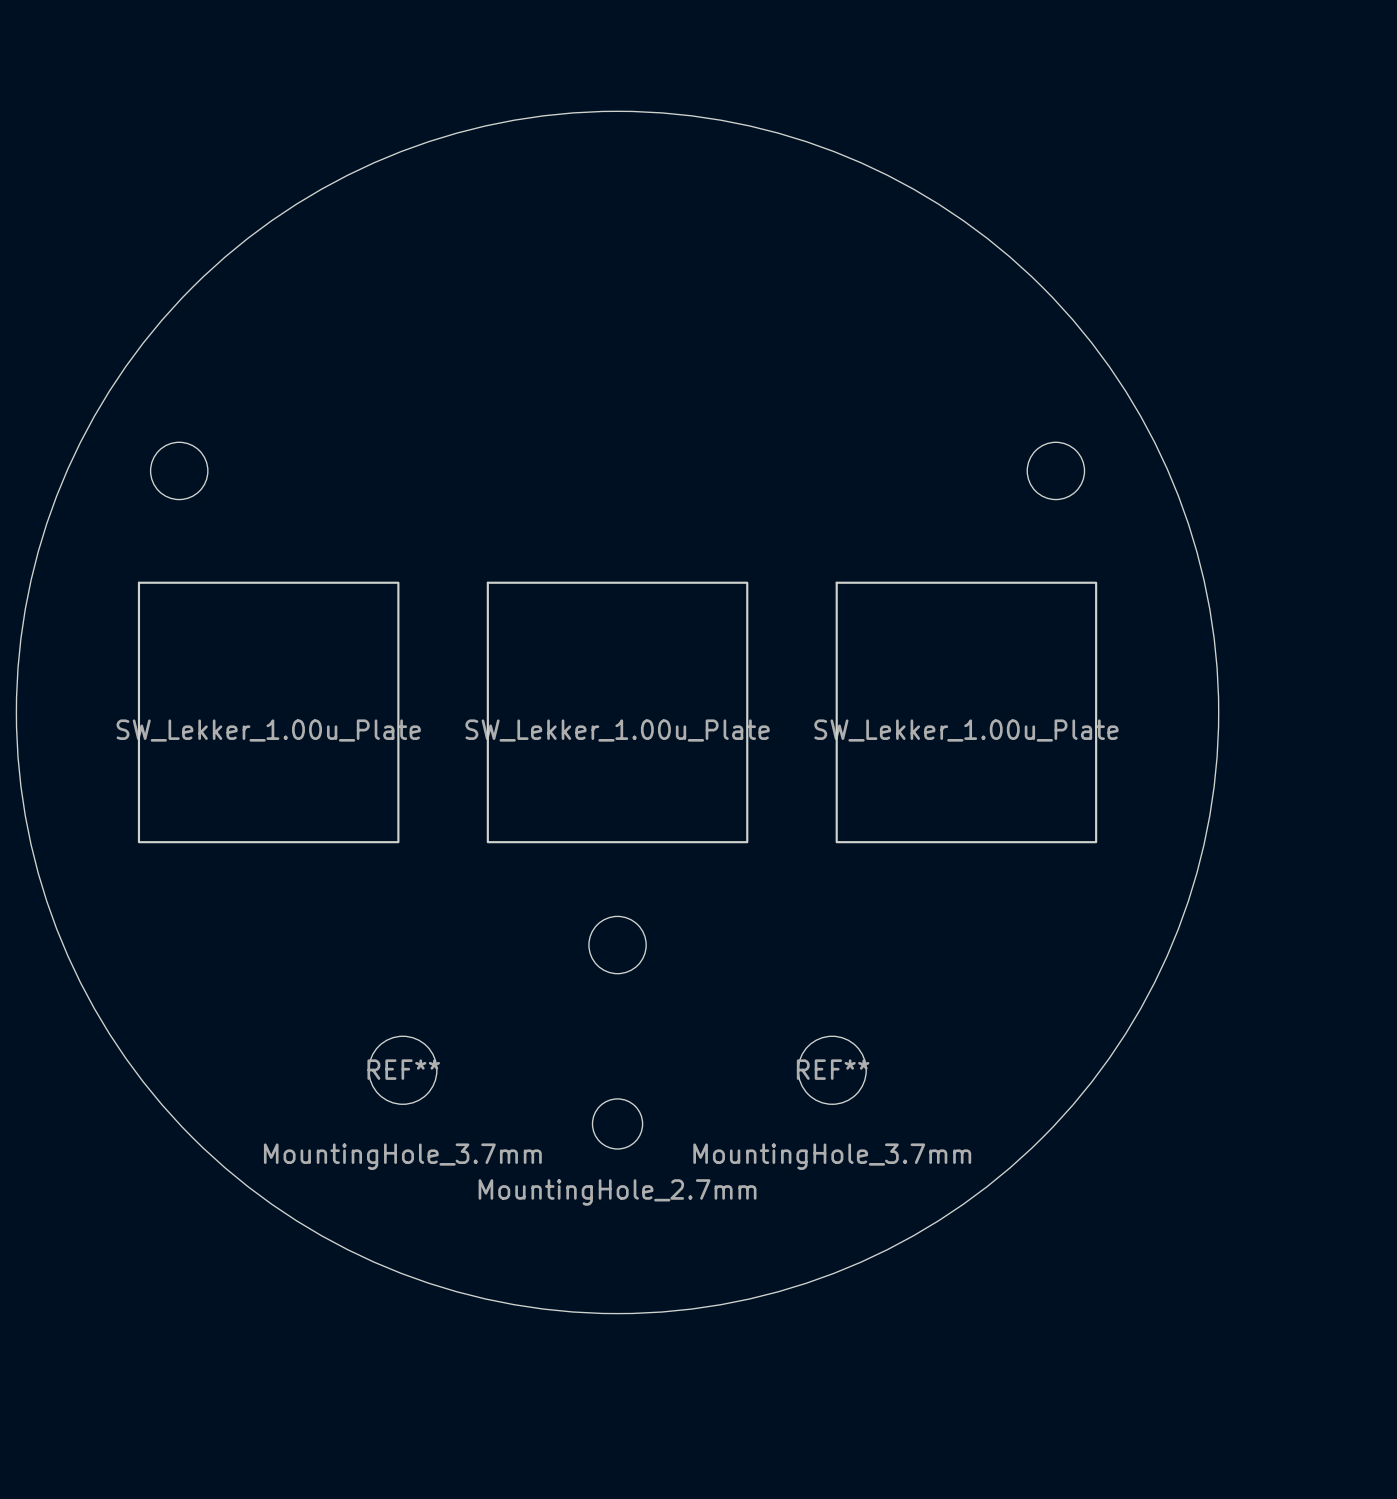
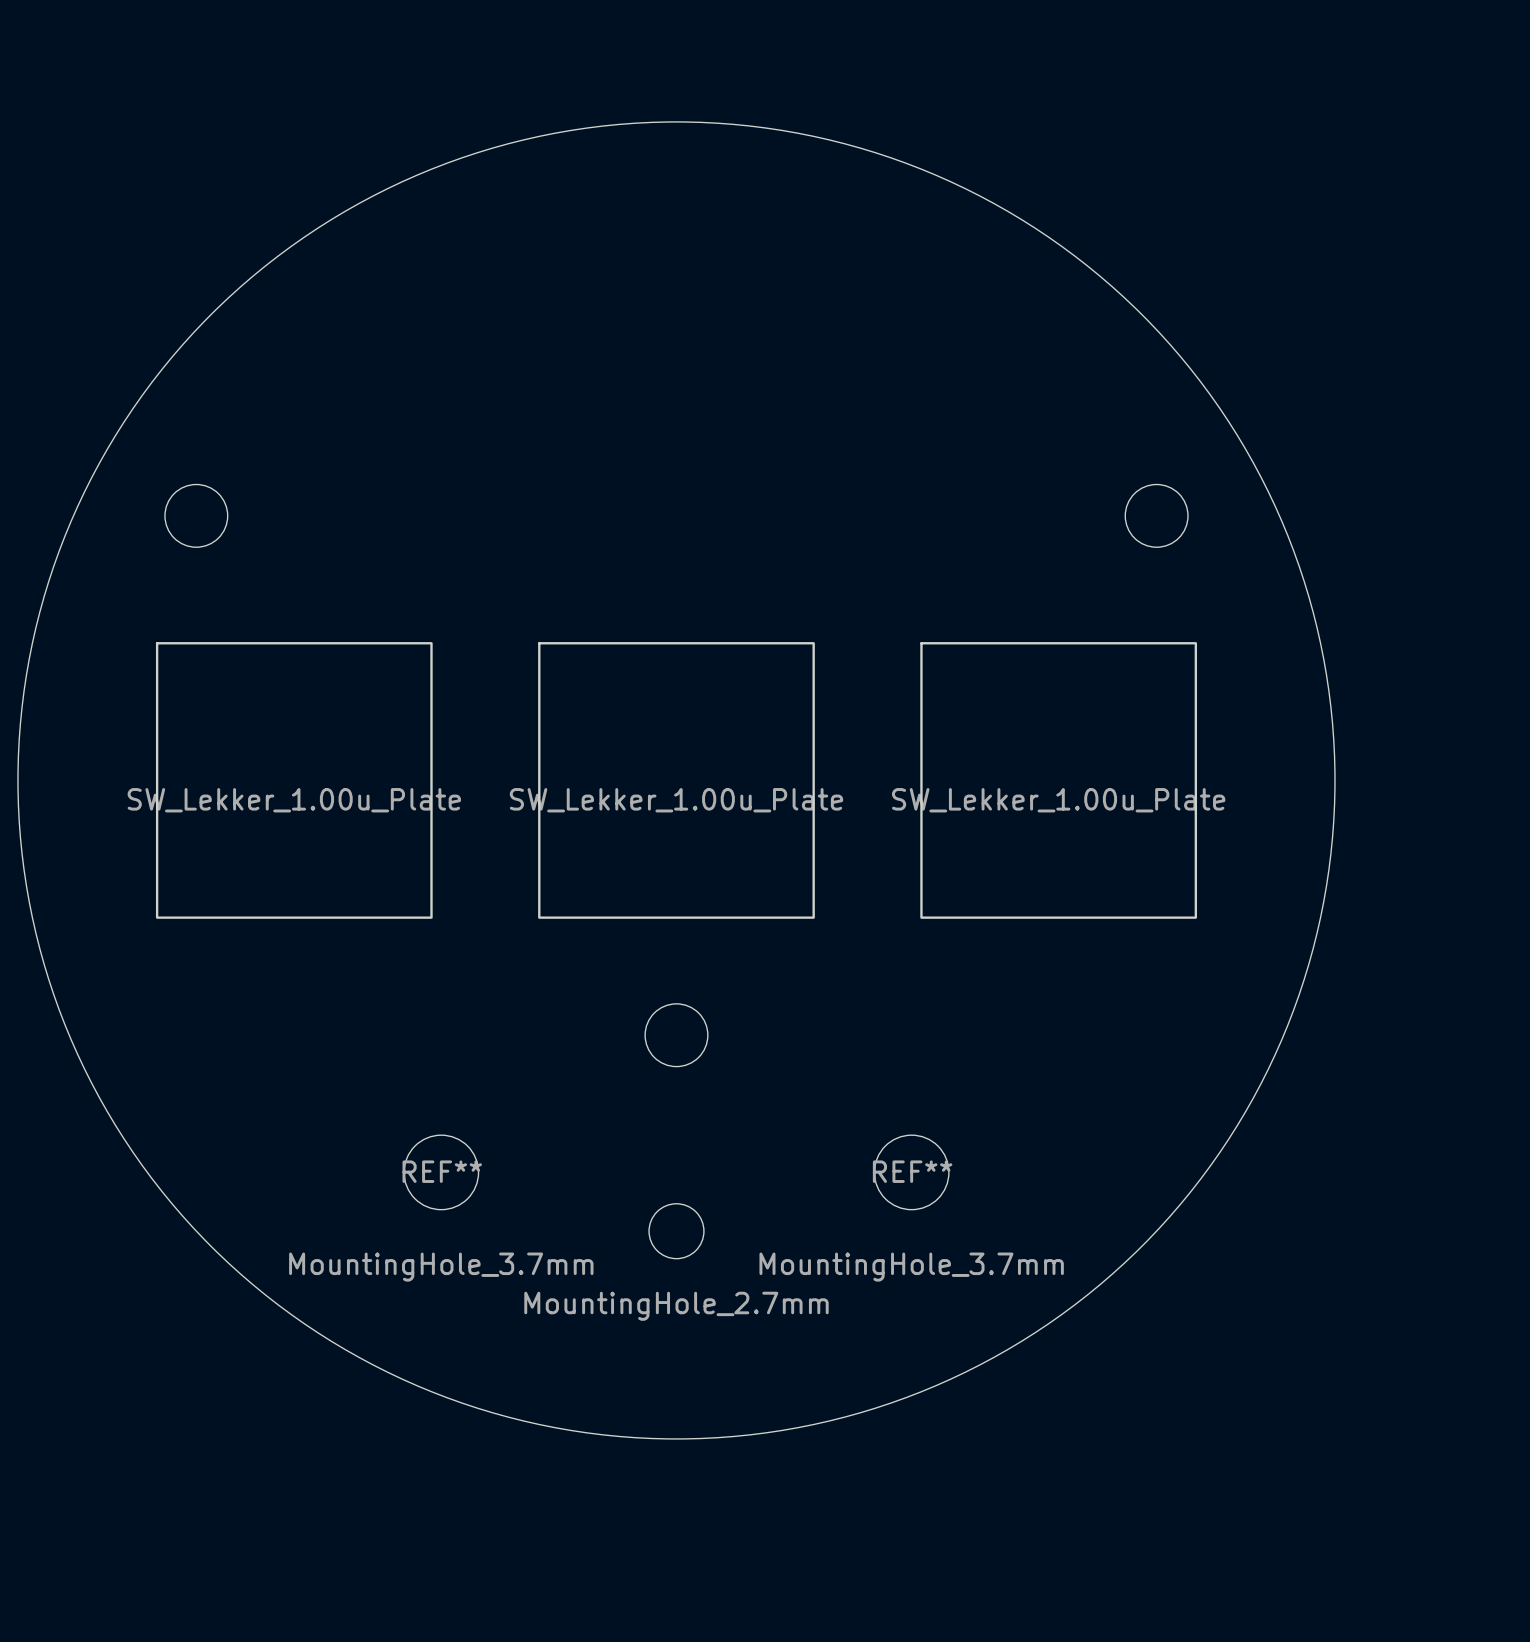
drawing shape: [116, 581, 421, 844] -> [127, 642, 461, 919]
drawing shape: [465, 581, 770, 844] -> [509, 642, 844, 919]
drawing shape: [814, 581, 1119, 844] -> [891, 642, 1226, 919]

